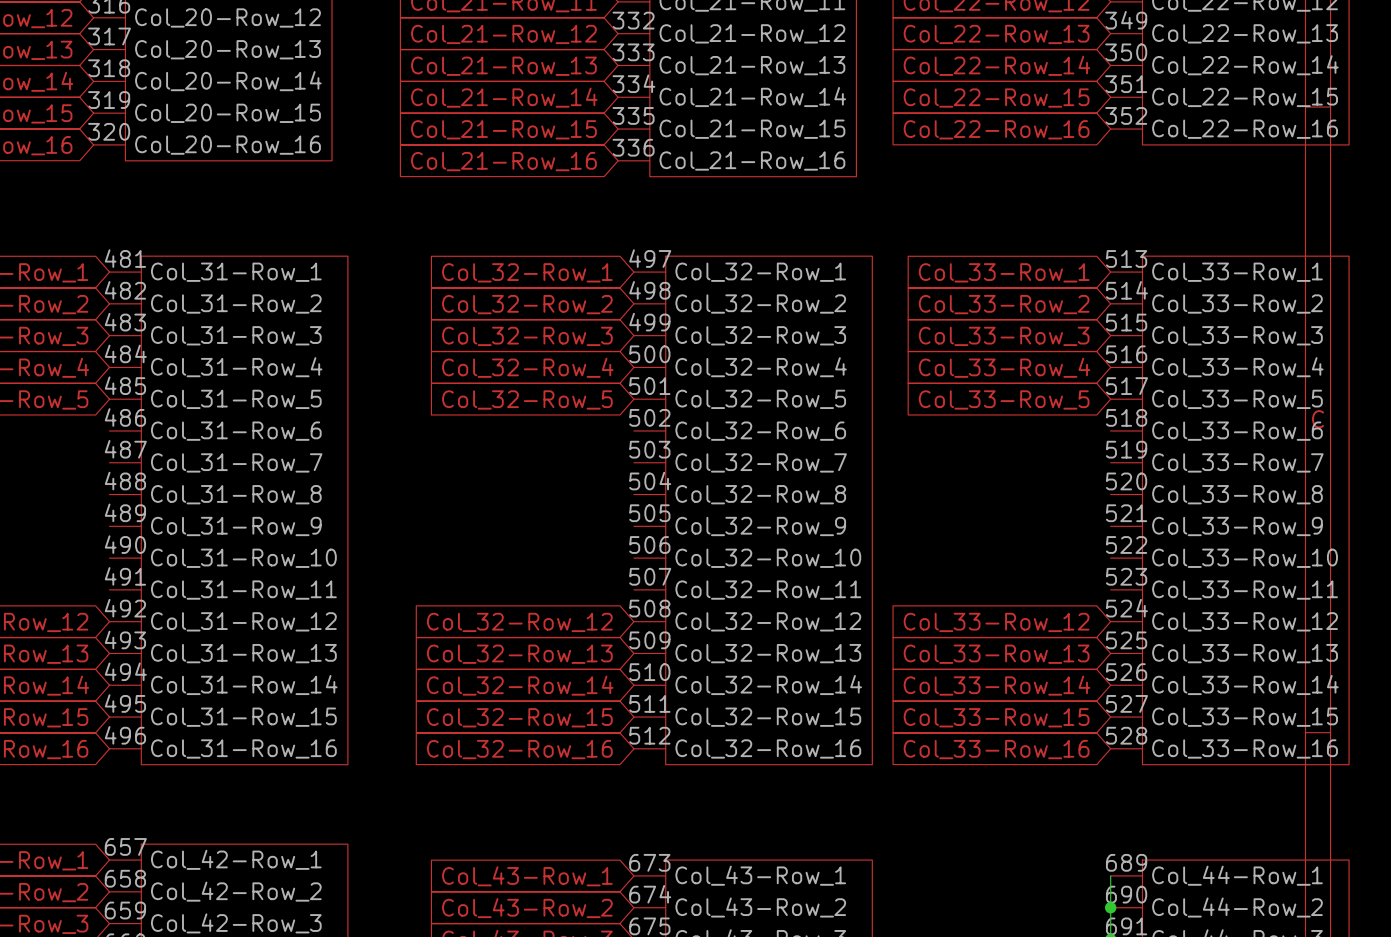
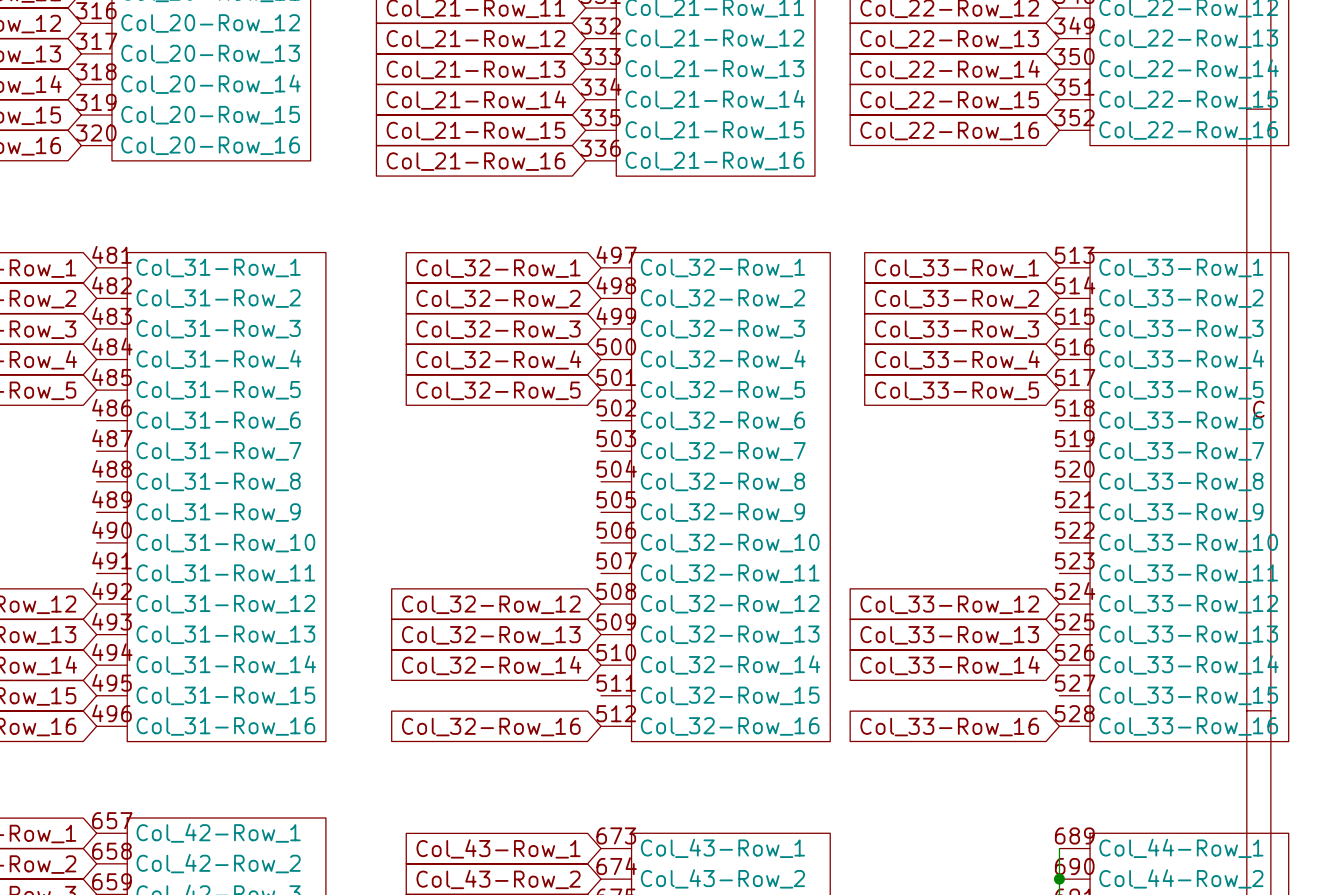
global label: Col_32-Row_15 (519, 717) -> none
global label: Col_33-Row_15 (996, 717) -> none

